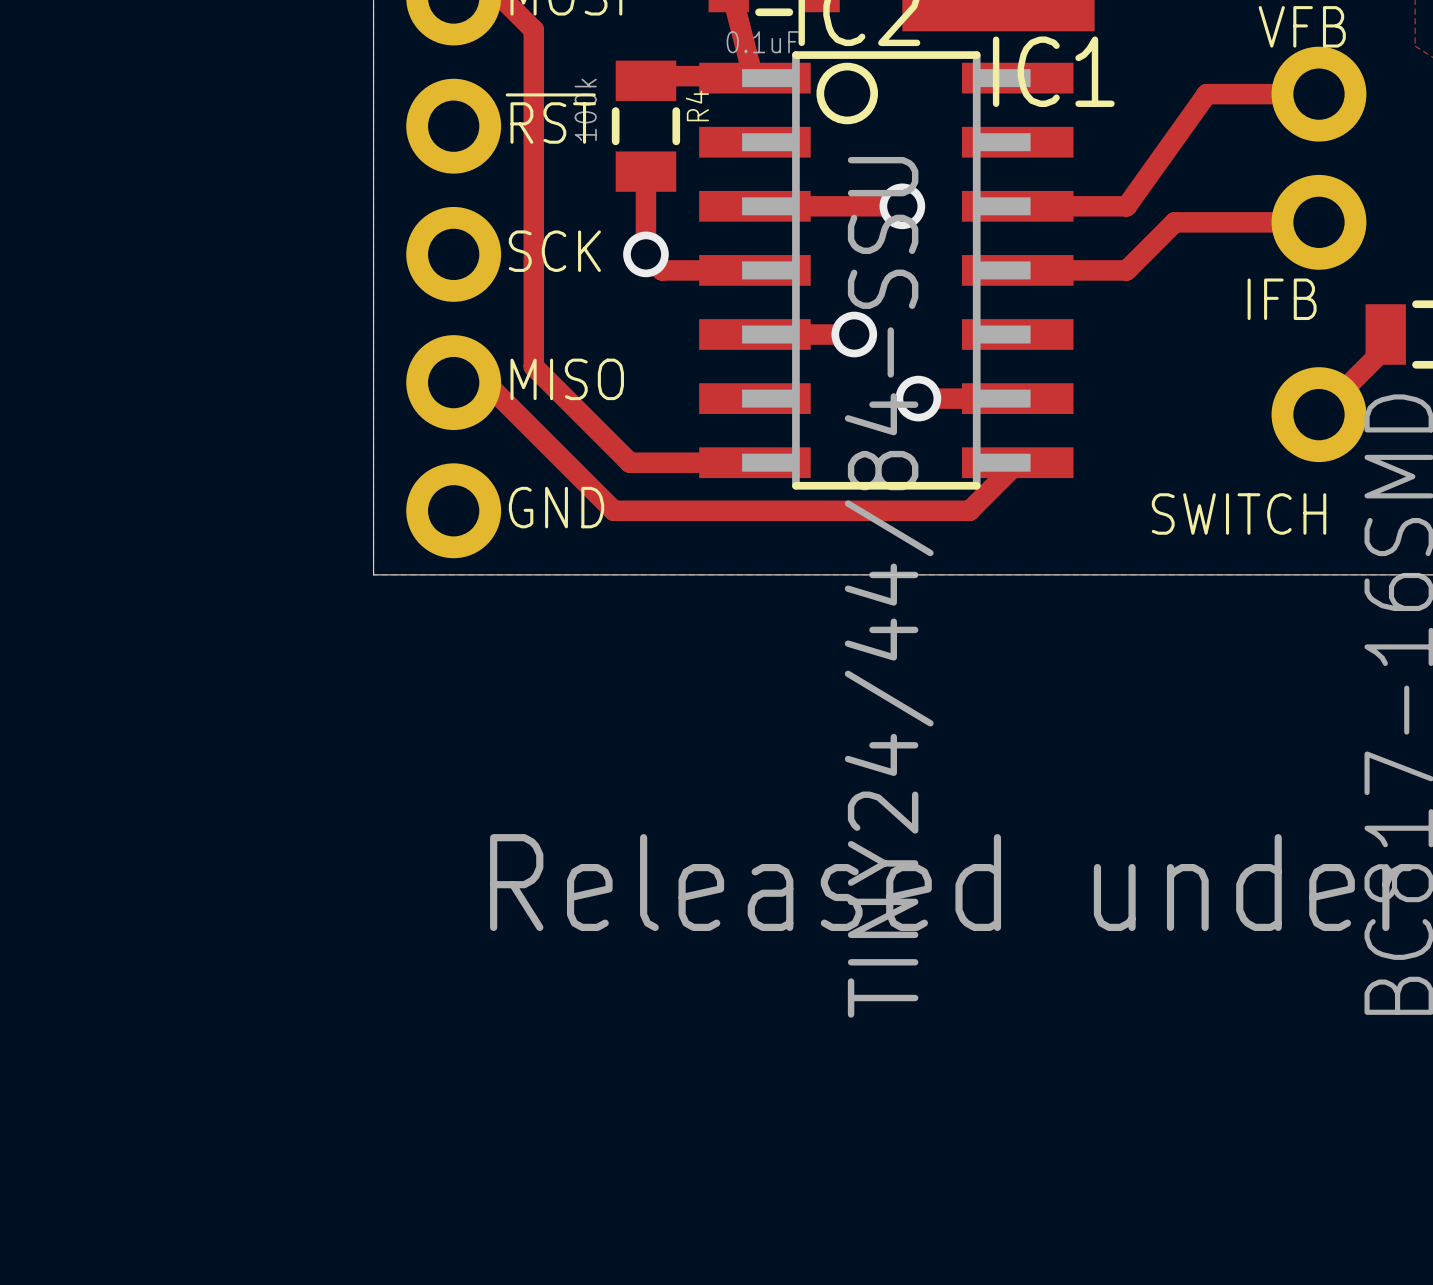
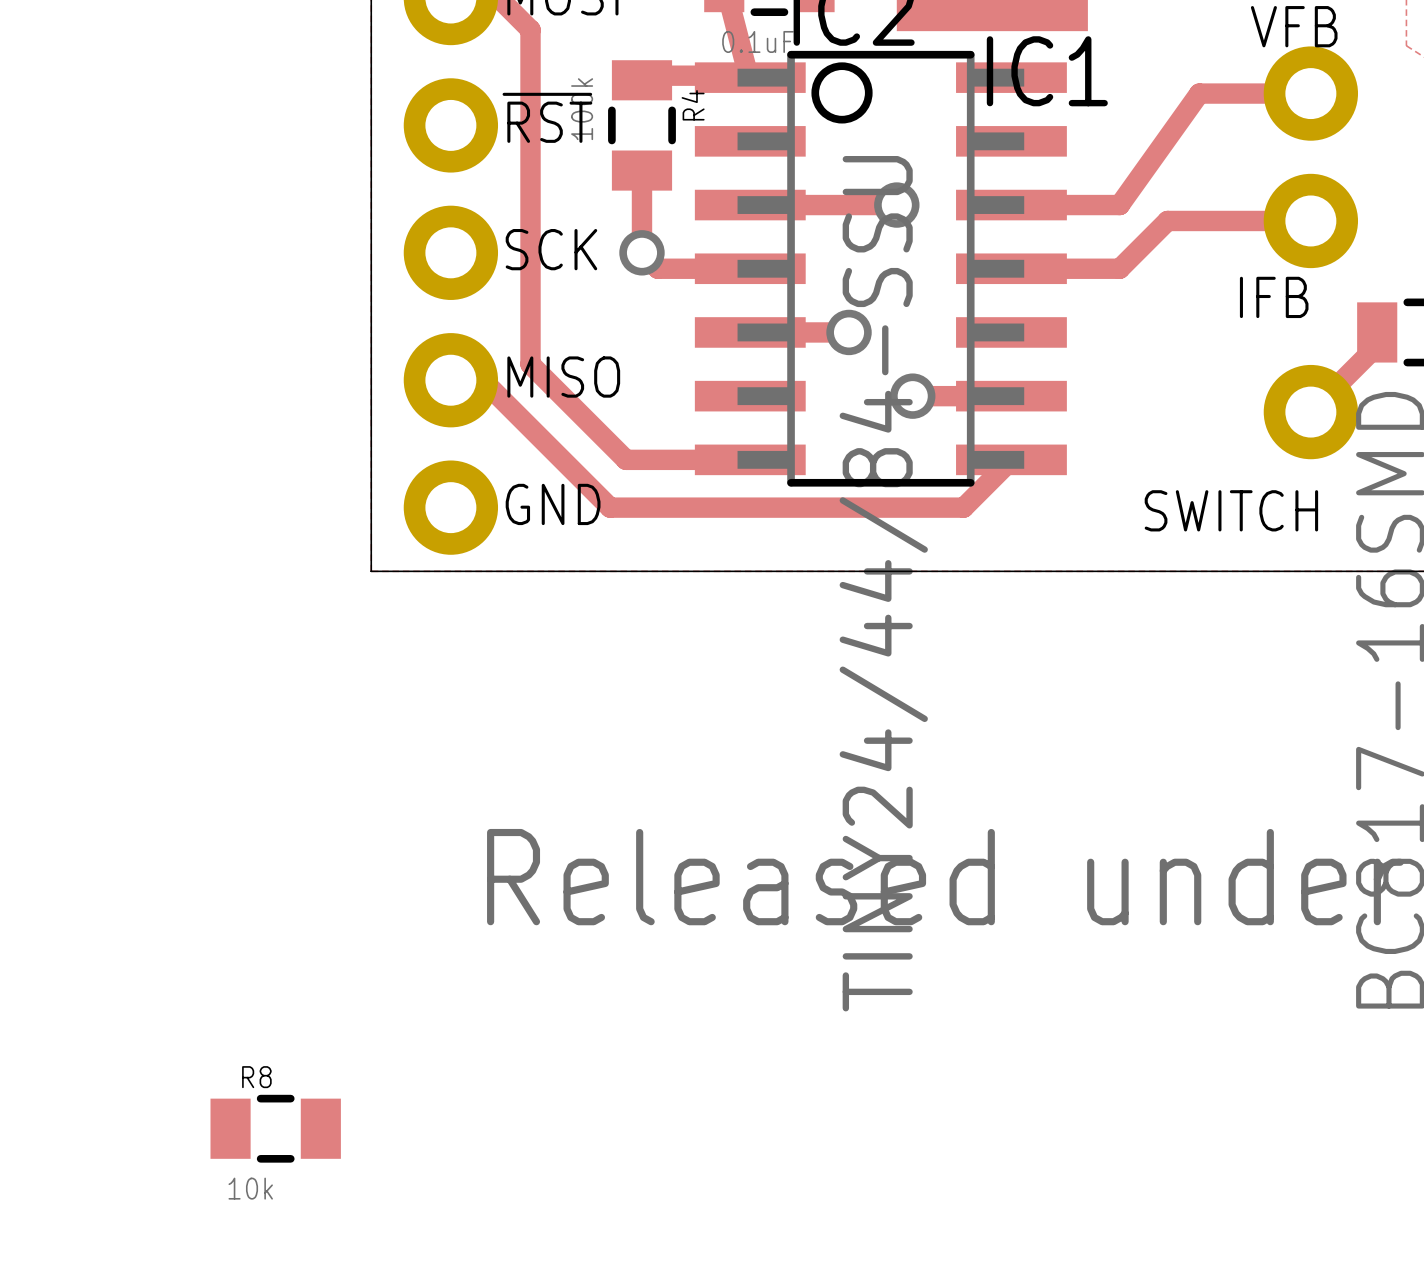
R8: none -> 10k (275, 1128)

